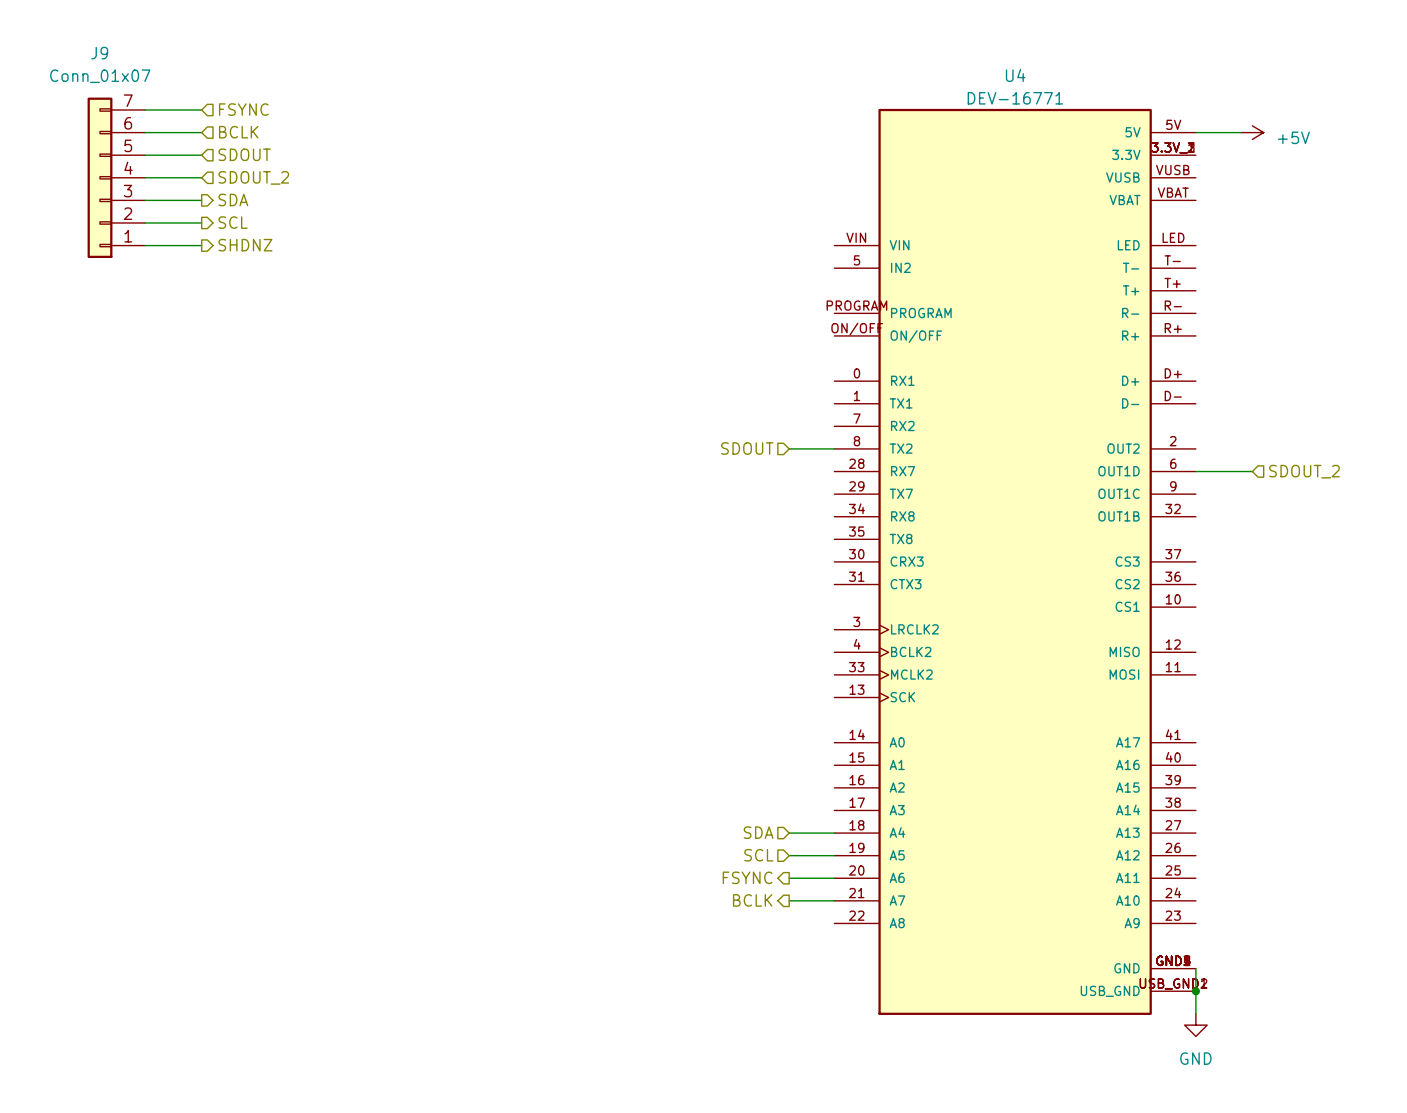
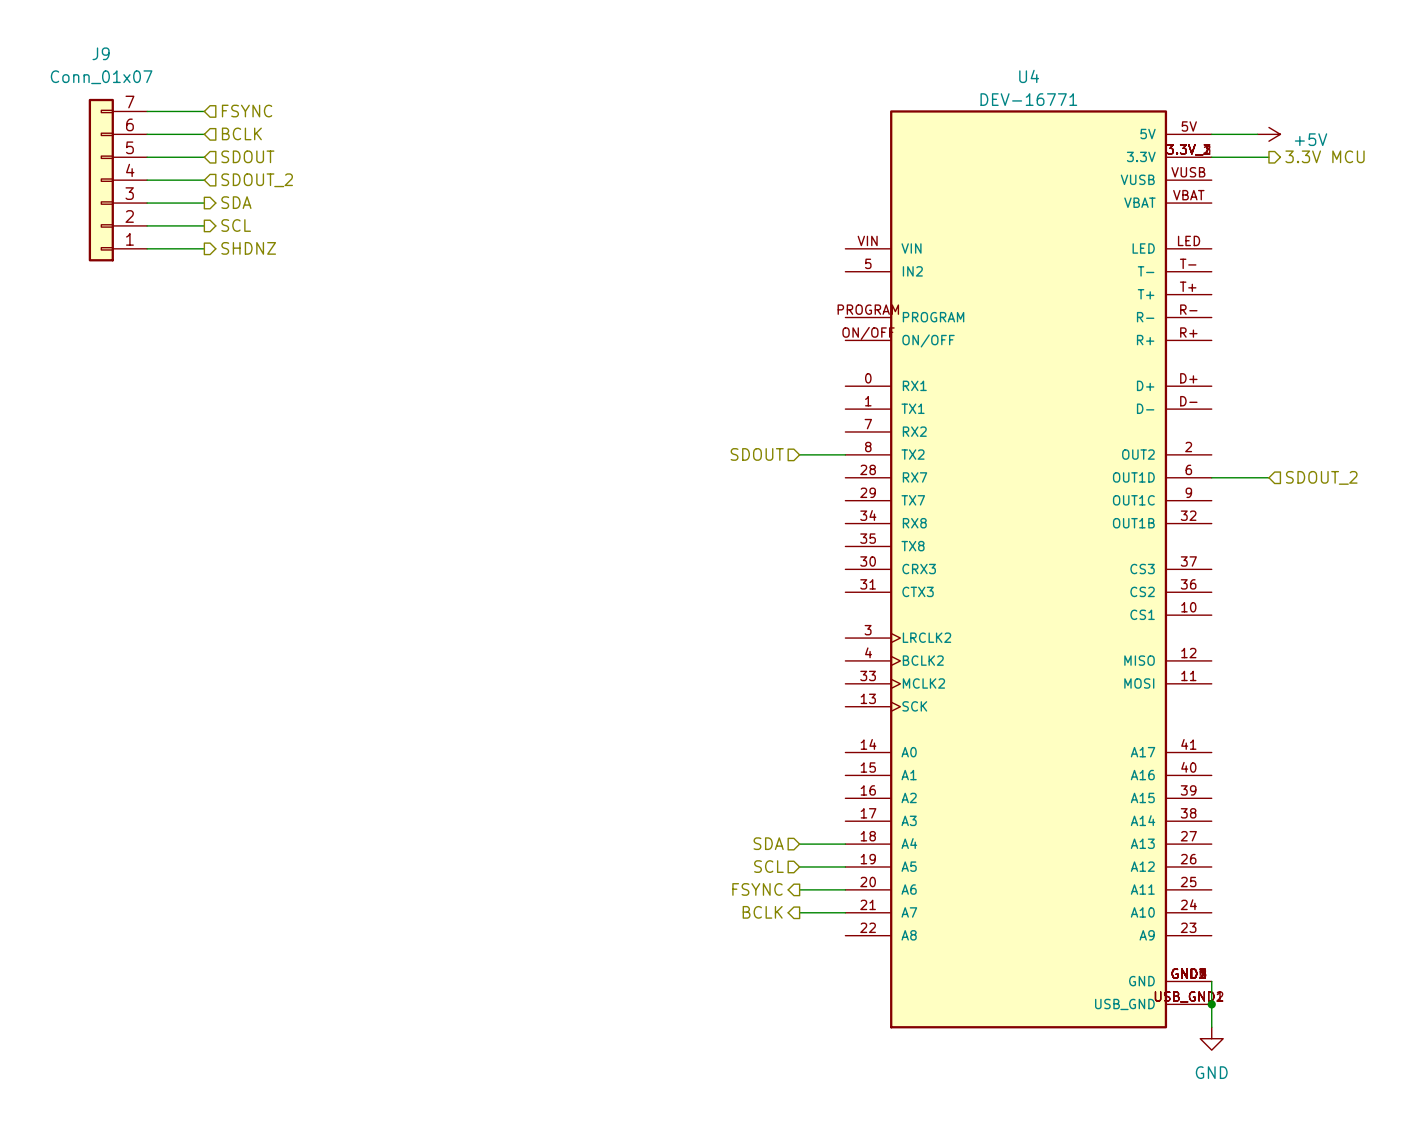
hierarchical label: none -> 3.3V MCU (1325, 156)
wire: none -> (1211, 157) (1268, 157)

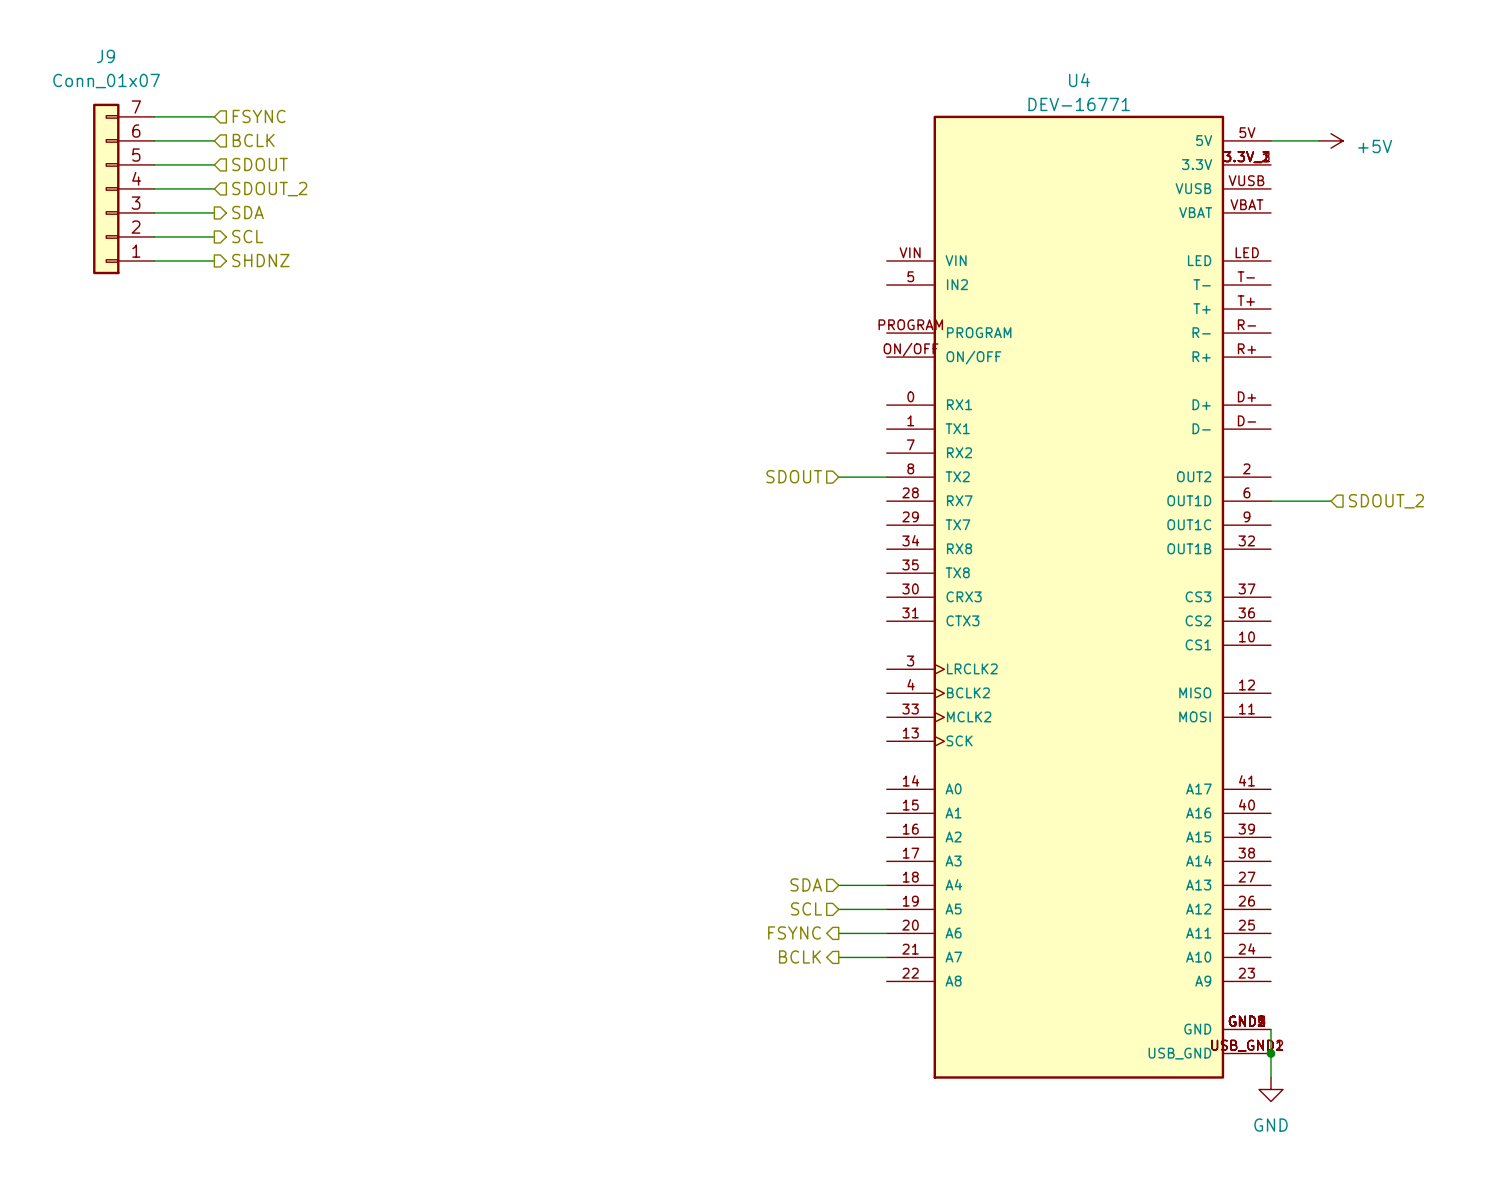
hierarchical label: 3.3V MCU (1325, 156) -> none
wire: (1211, 157) (1268, 157) -> none

